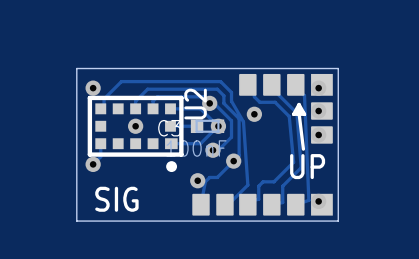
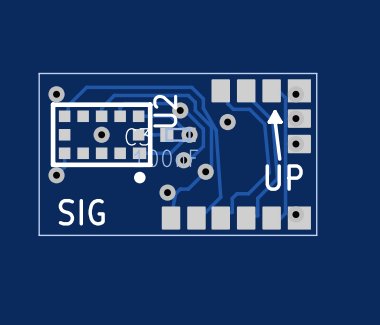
track: none -> (276, 86) (285, 97) (285, 213) (276, 222)
track: (295, 84) (304, 95) (308, 200) (295, 204) -> none

